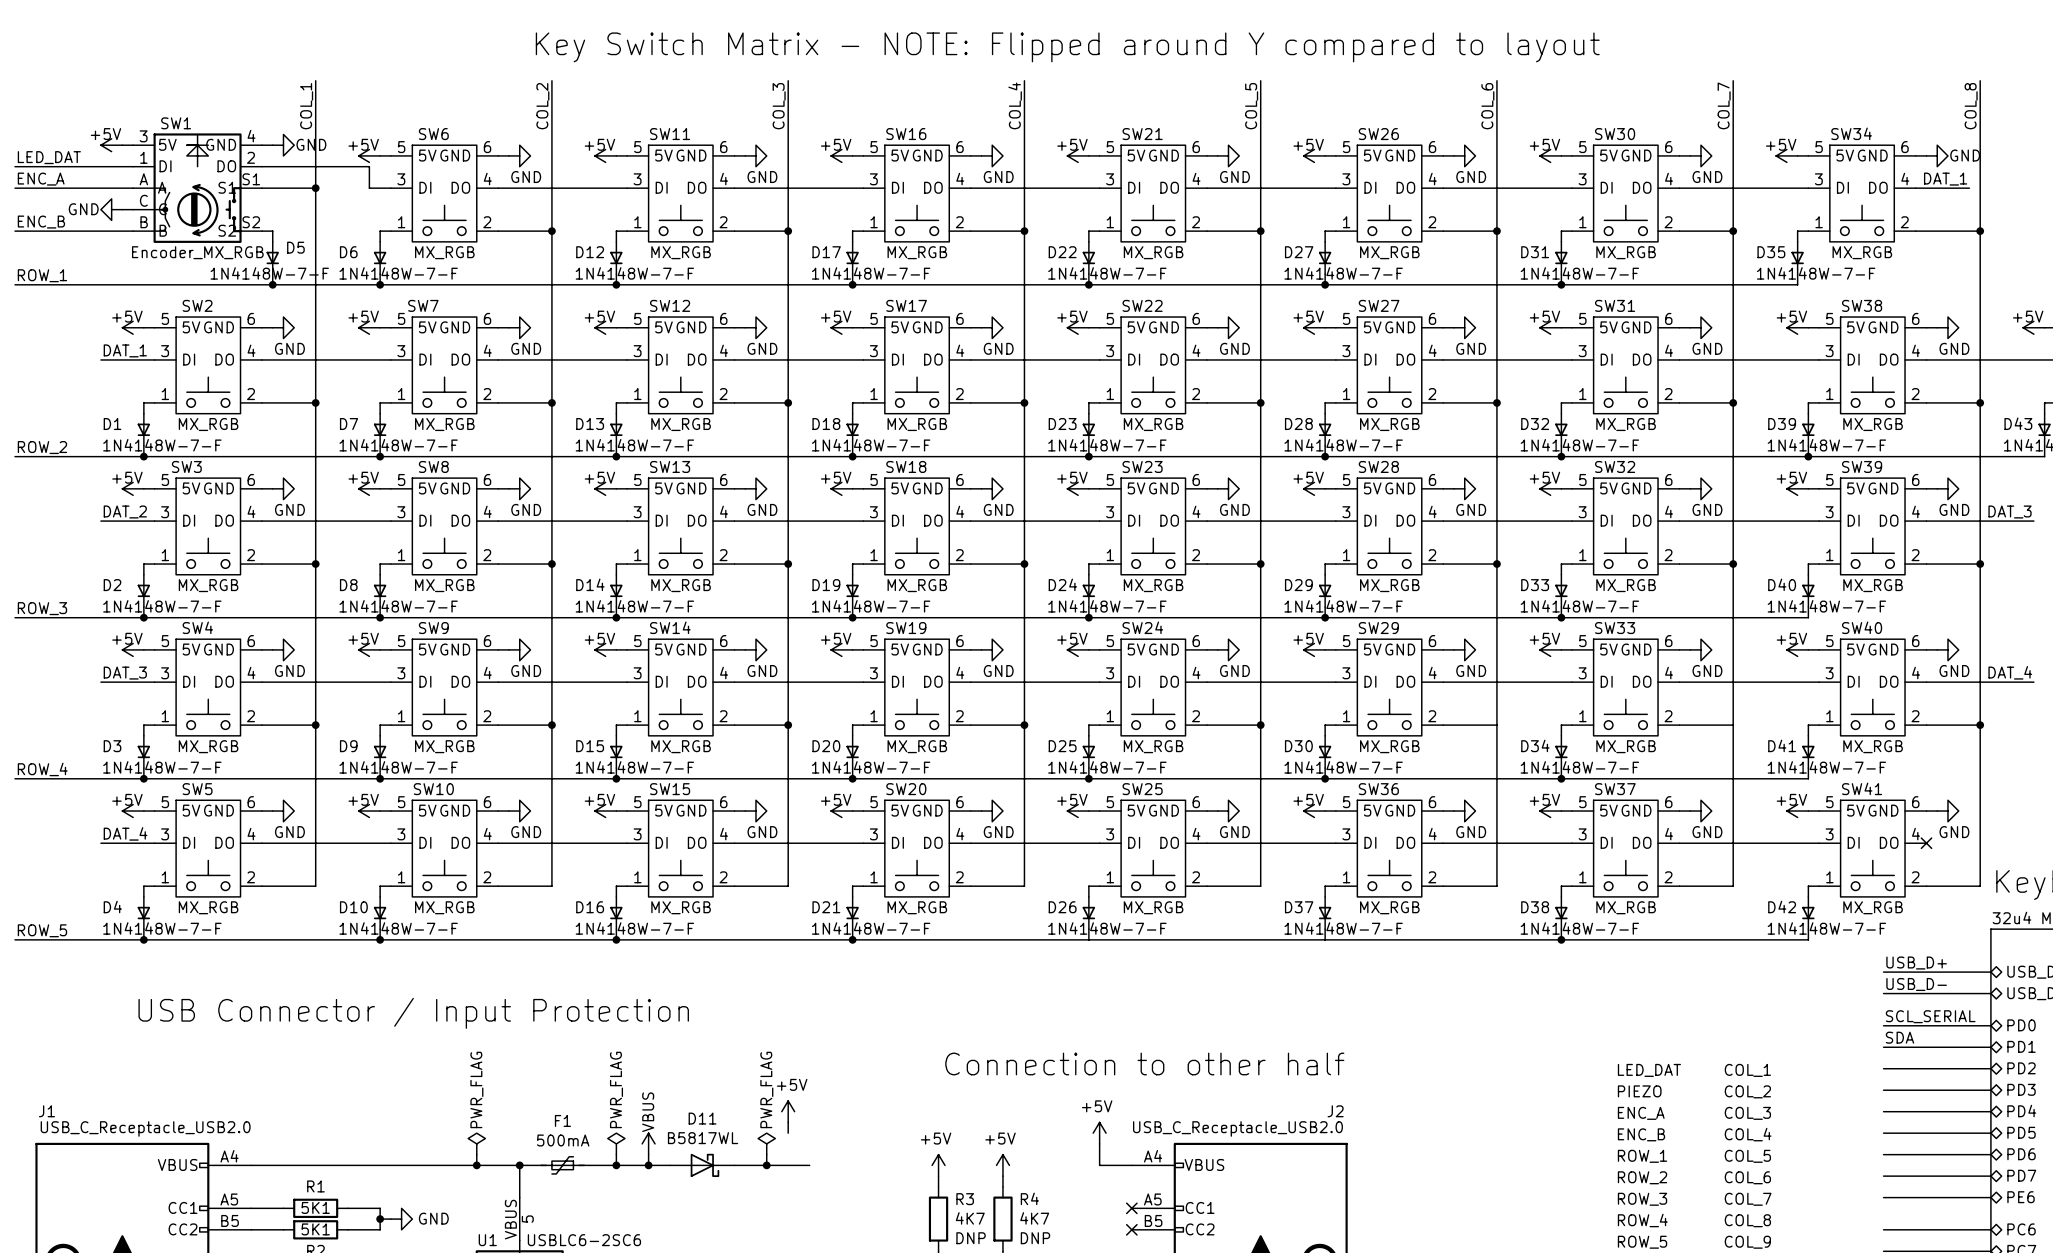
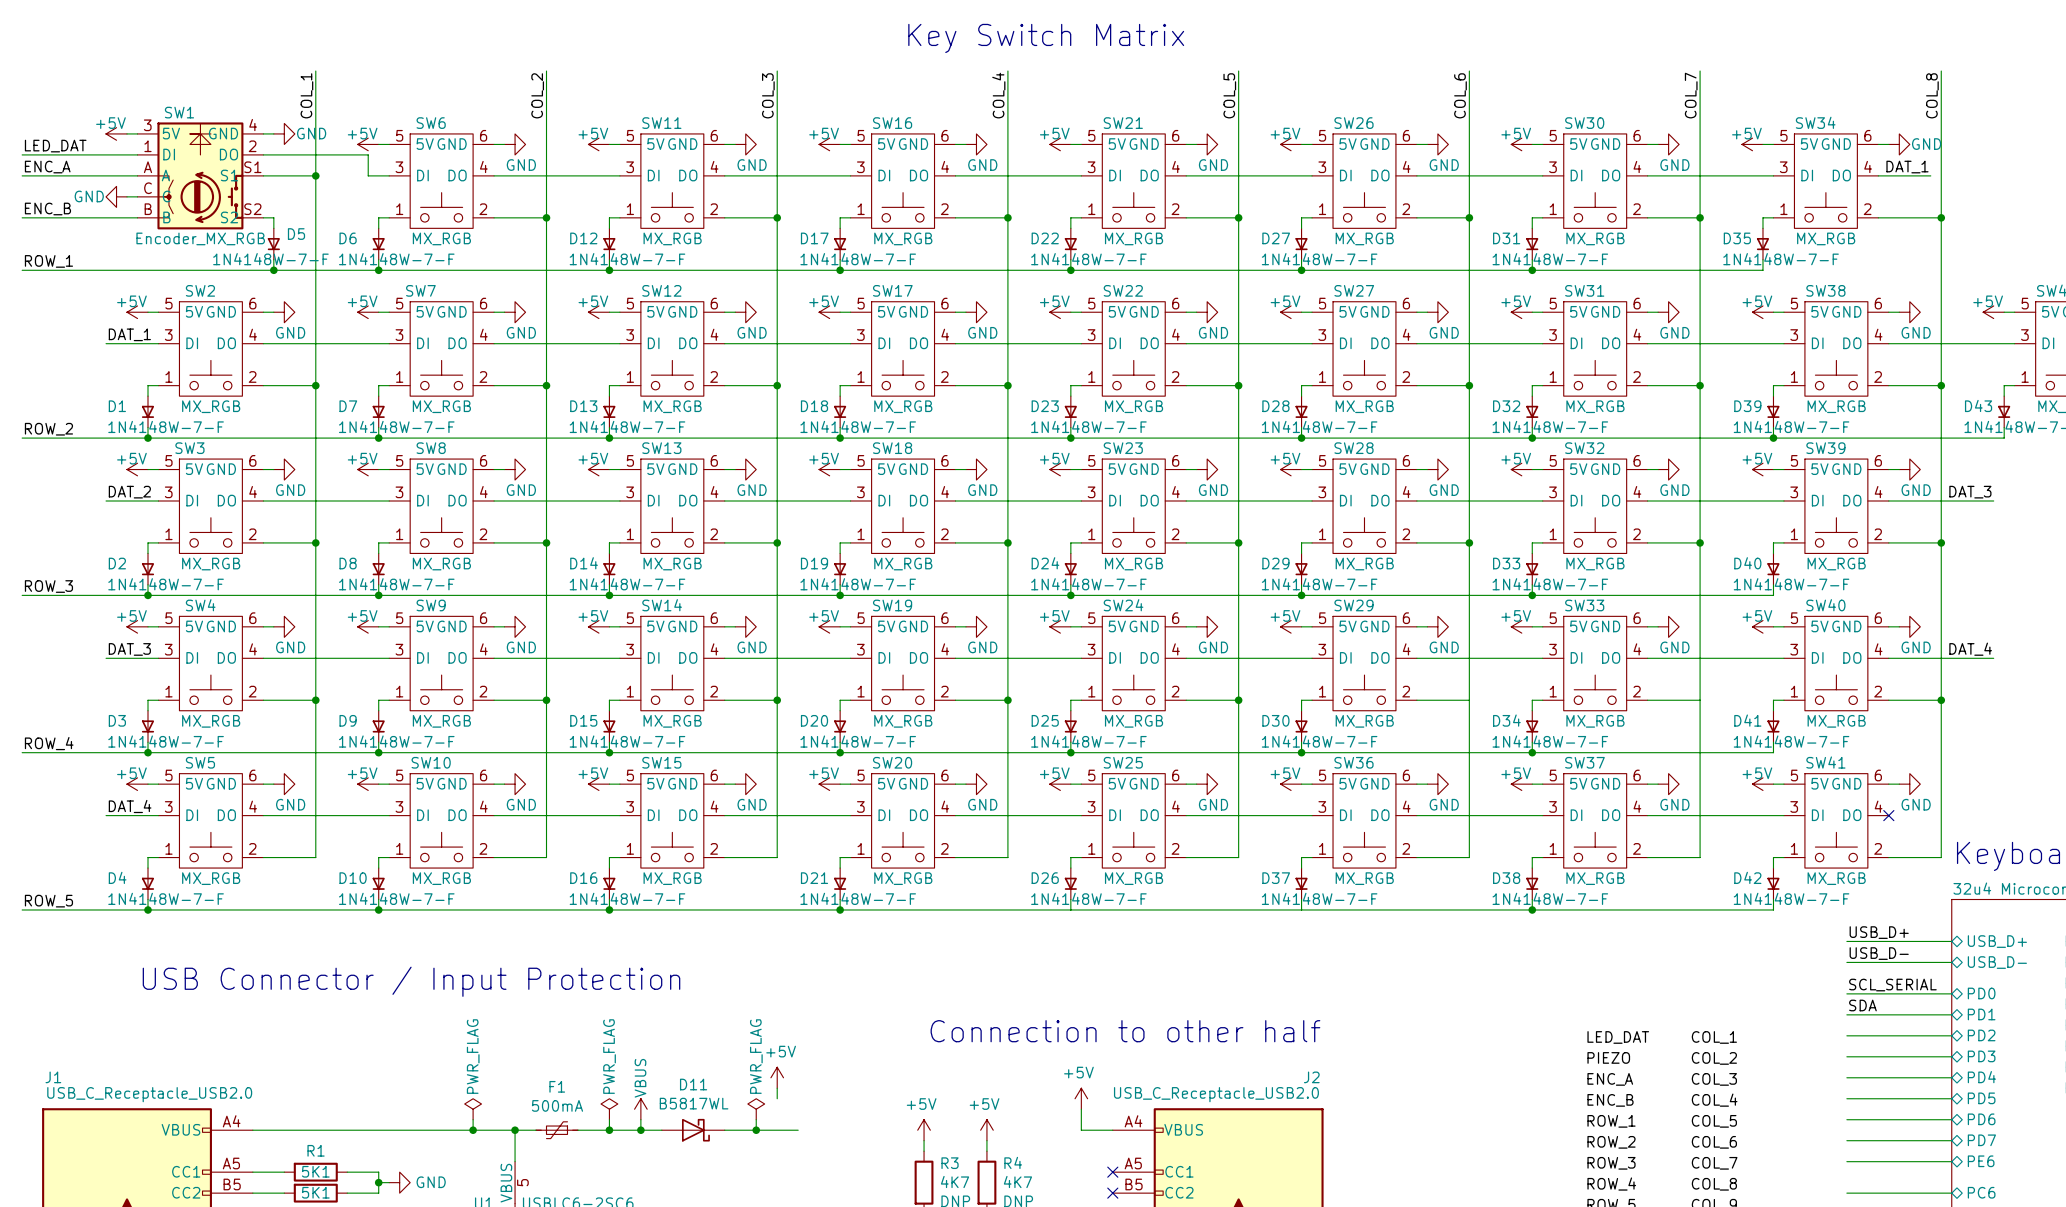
text: none -> Key Switch Matrix (1046, 38)
text: Key Switch Matrix - NOTE: Flipped around Y compared to layout (1067, 47) -> none

